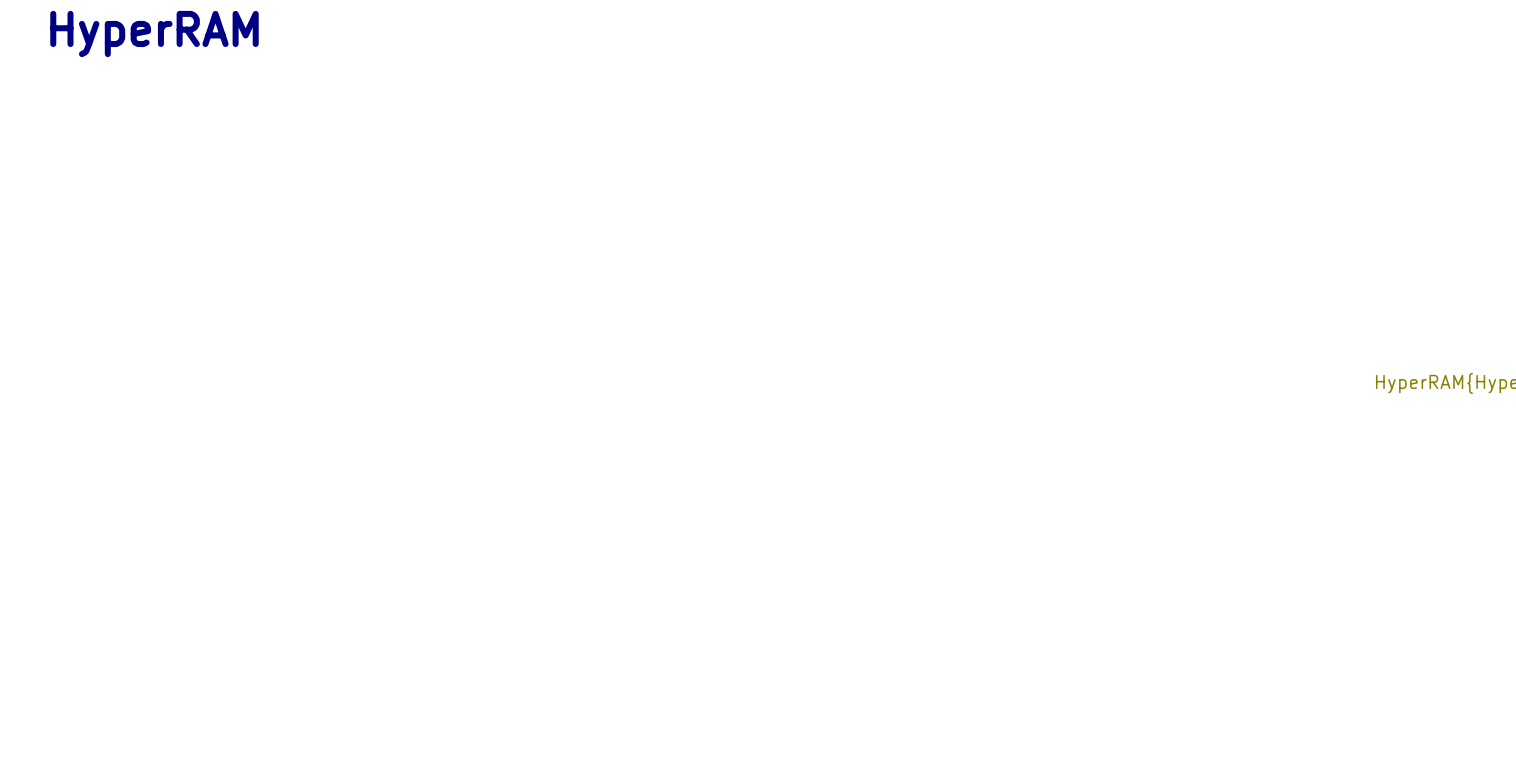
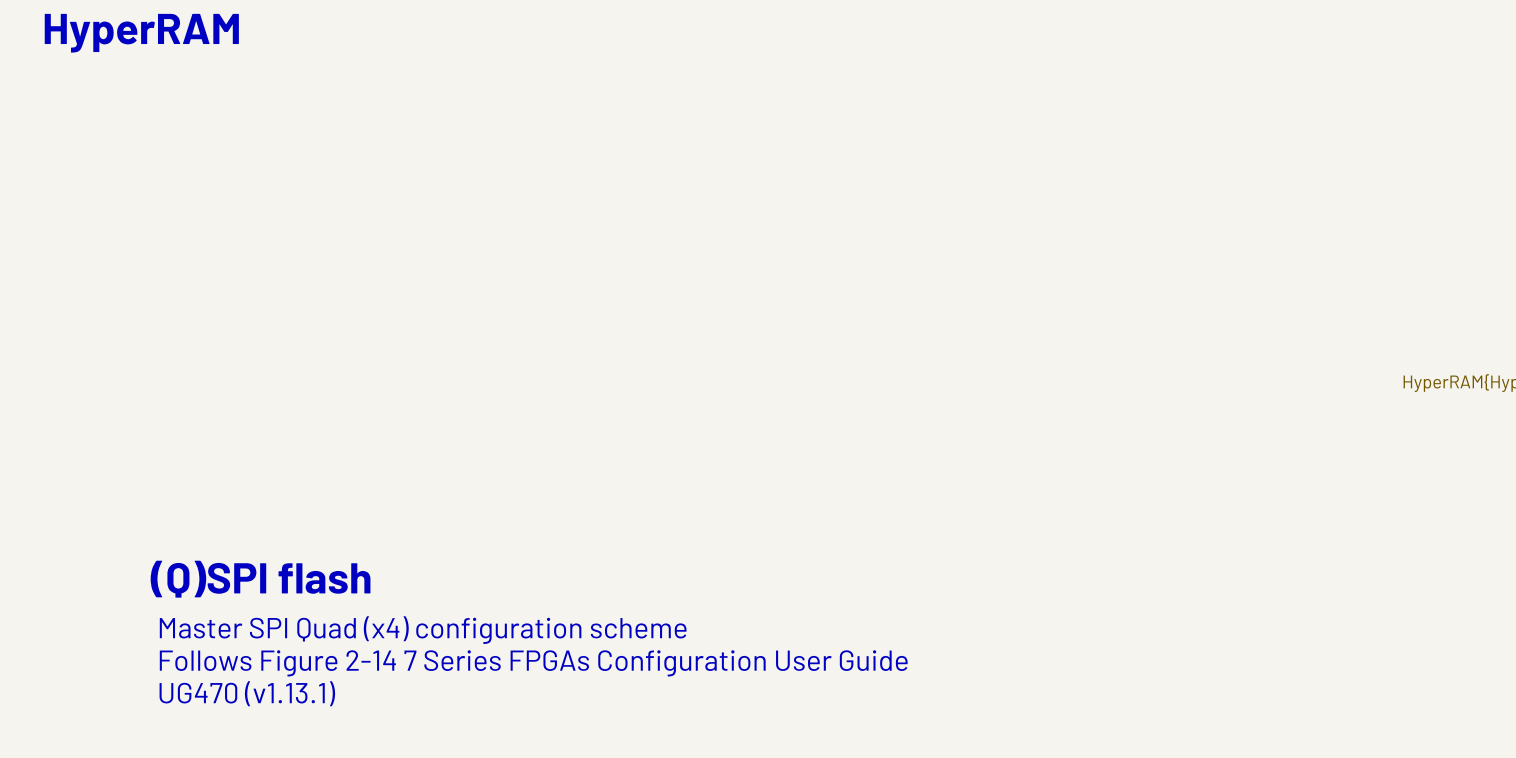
text: none -> (Q)SPI flash (260, 579)
text: none -> Master SPI Quad (x4) configuration scheme (423, 630)
text: none -> Follows Figure 2-14 7 Series FPGAs Configuration User Guide (533, 663)
text: none -> UG470 (v1.13.1) (247, 693)

